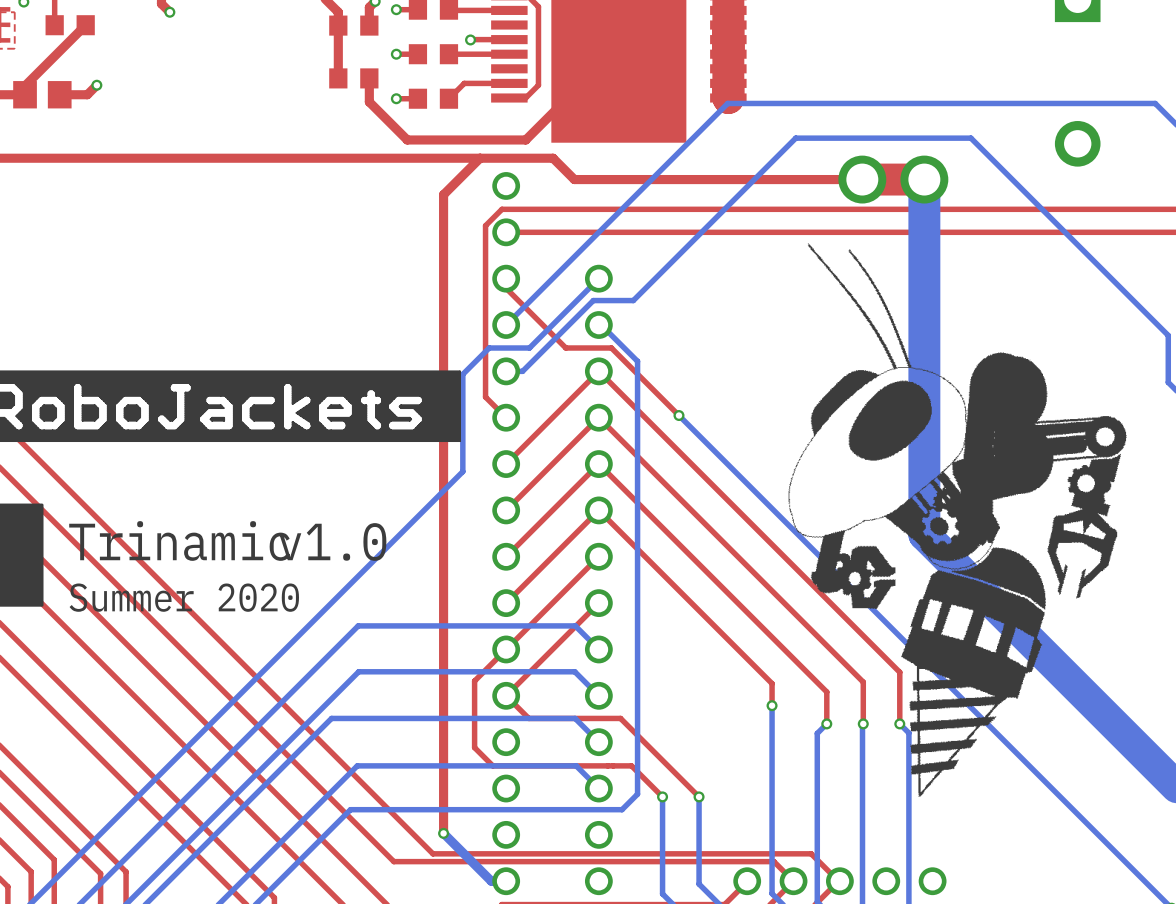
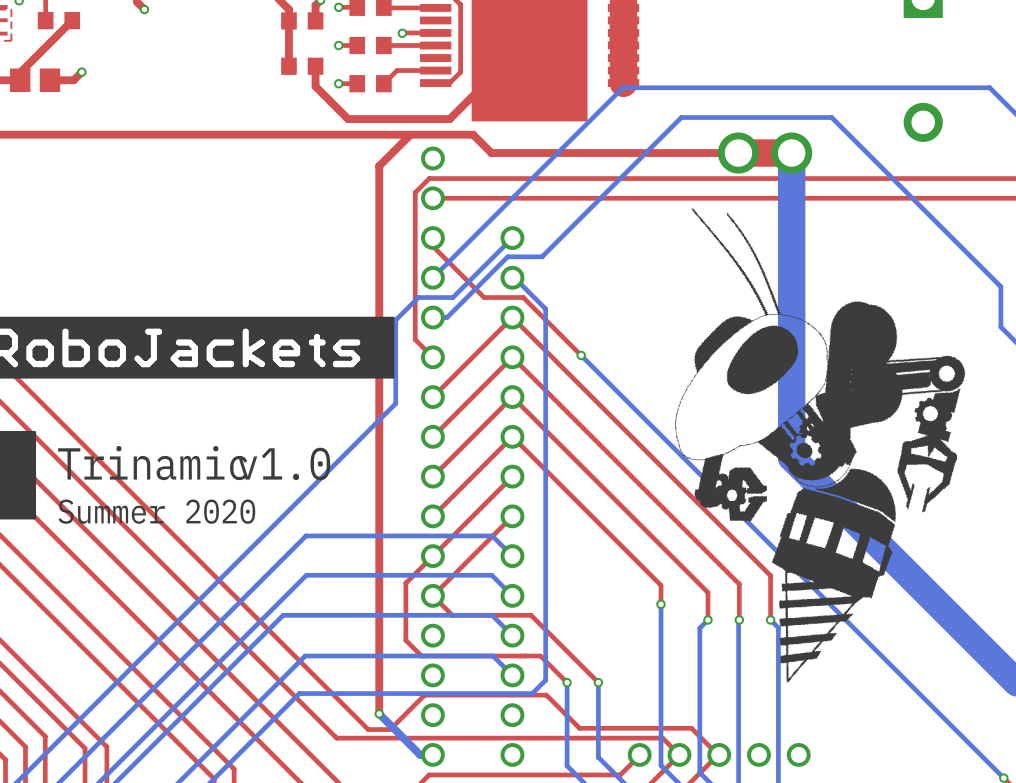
top track: (430, 851) (432, 853) (811, 853) -> (368, 729) (390, 729) (424, 695) (546, 695) (579, 728) (691, 728) (694, 731)

